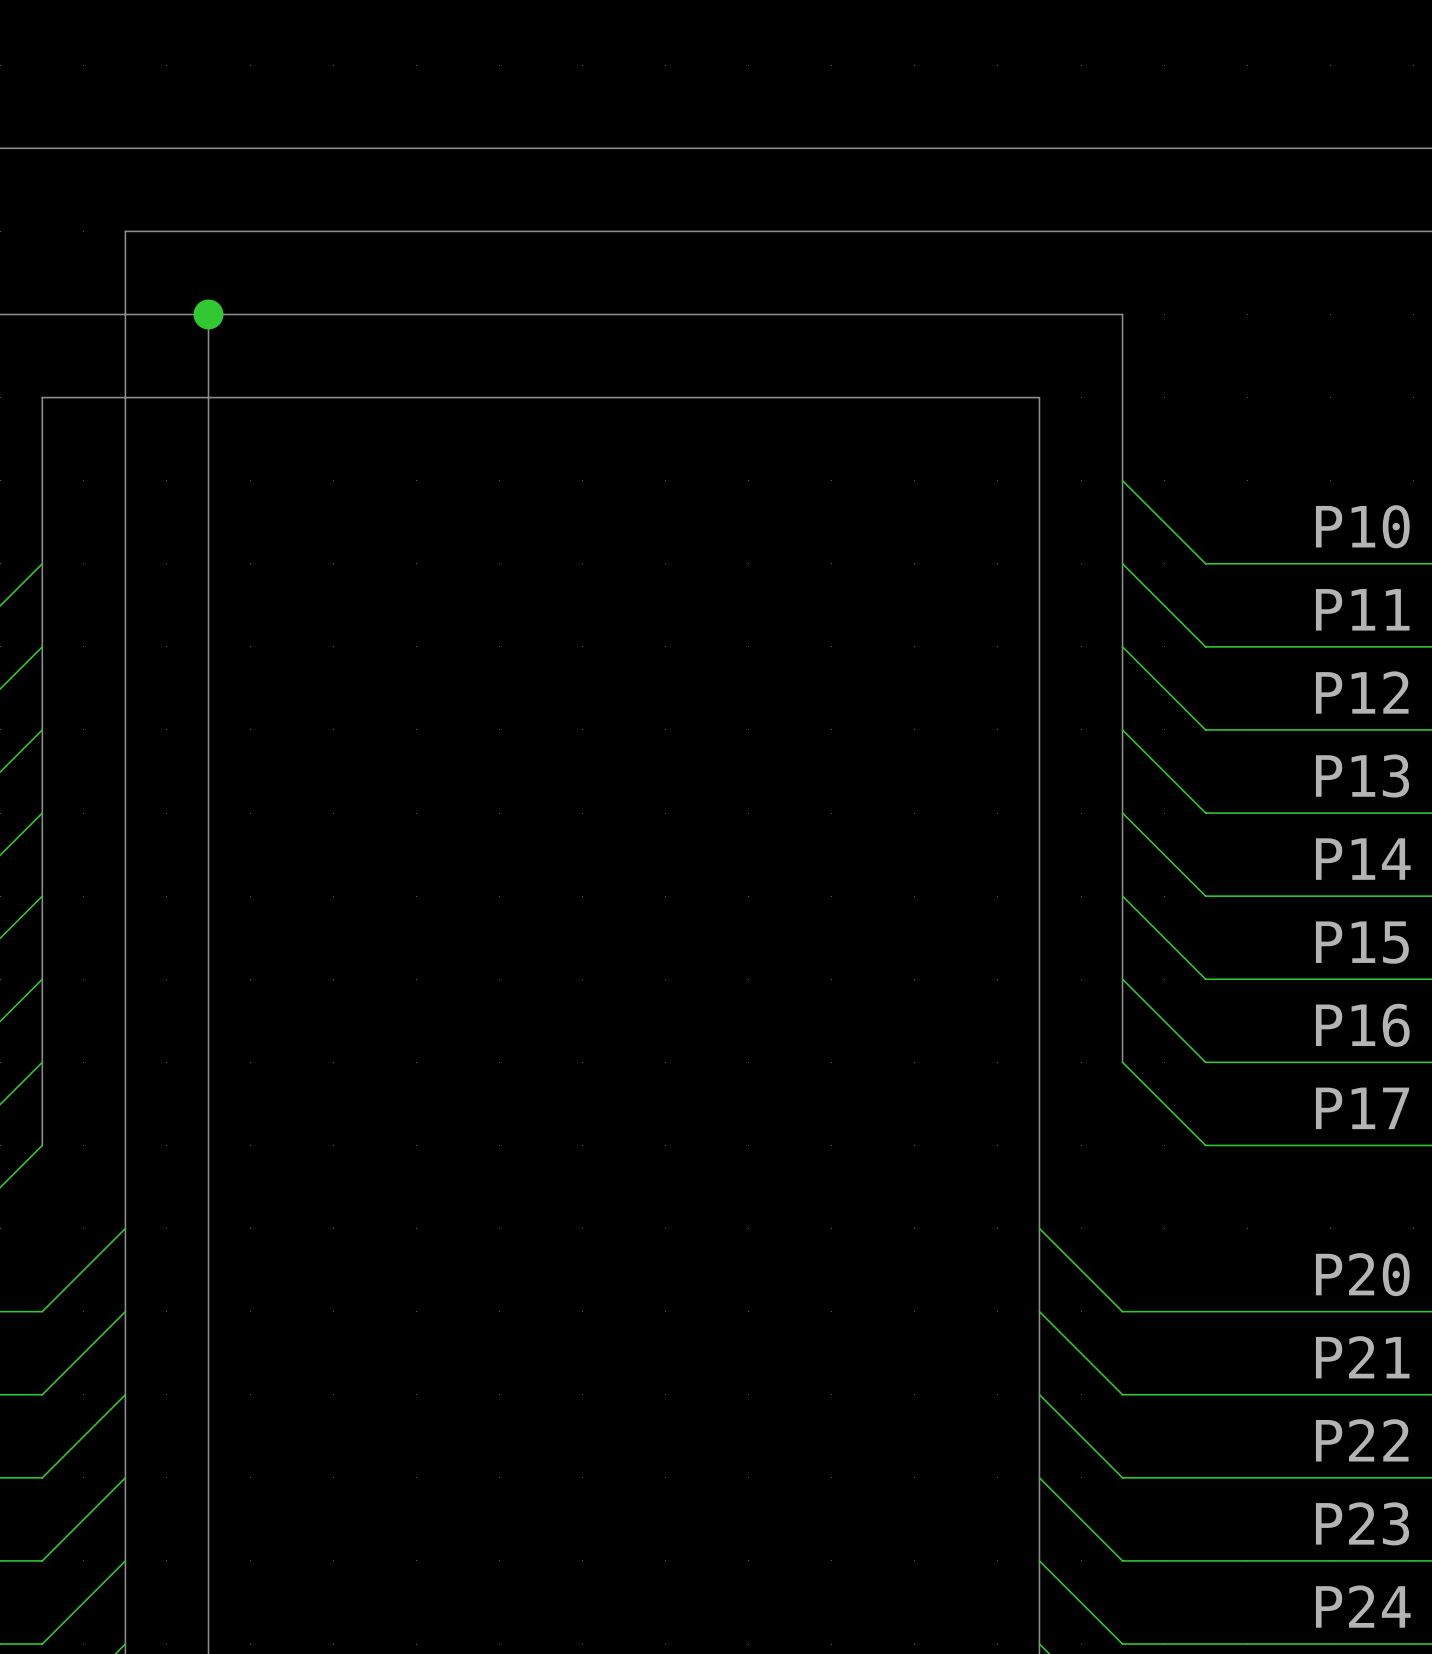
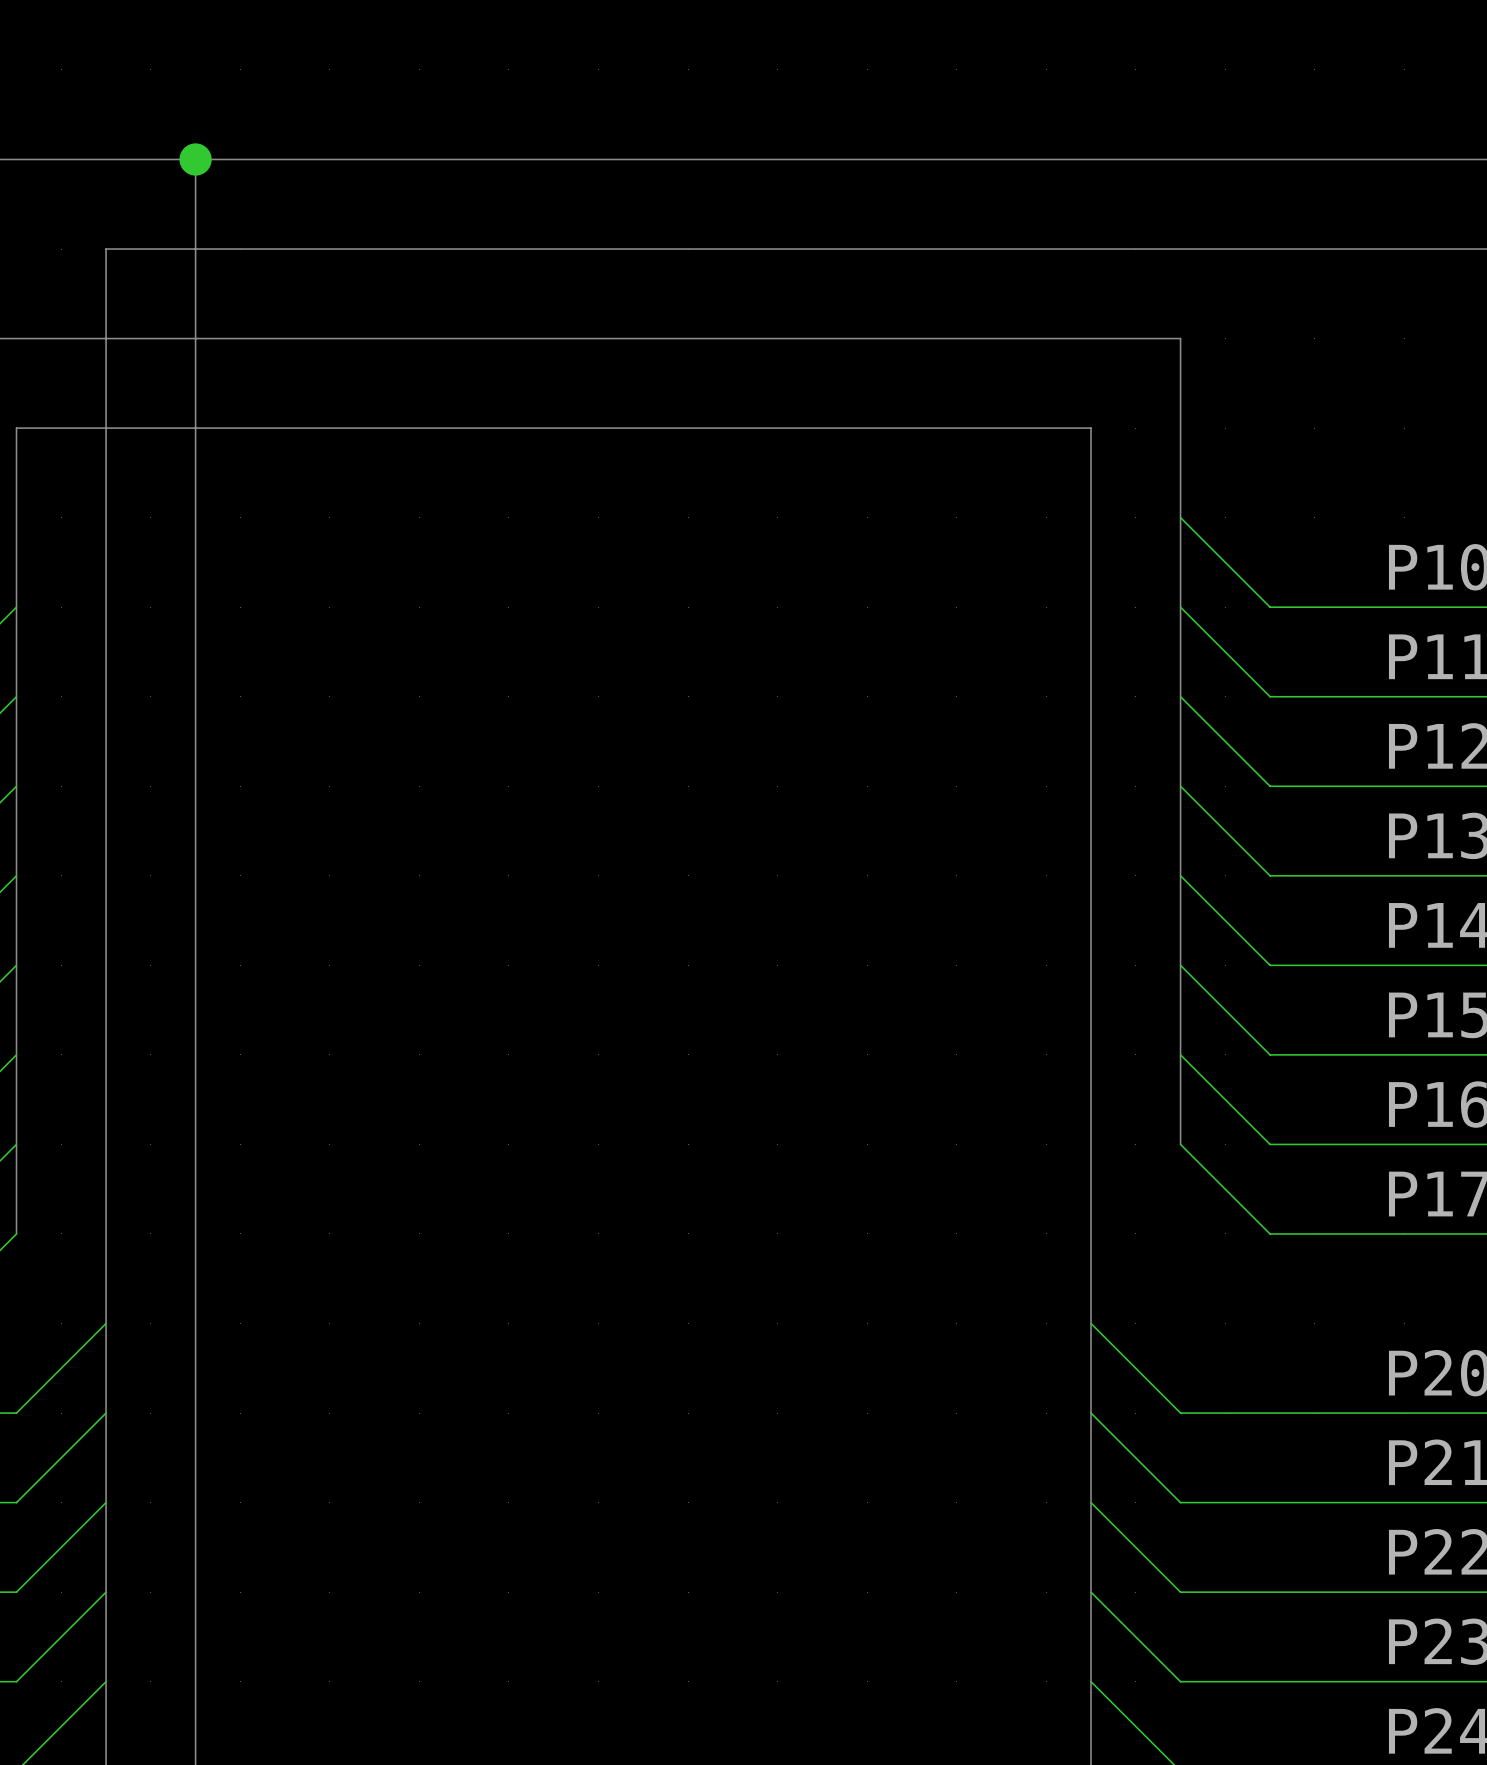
bus: none -> (195, 159) (195, 338)
junction position: (208, 314) -> (195, 159)

